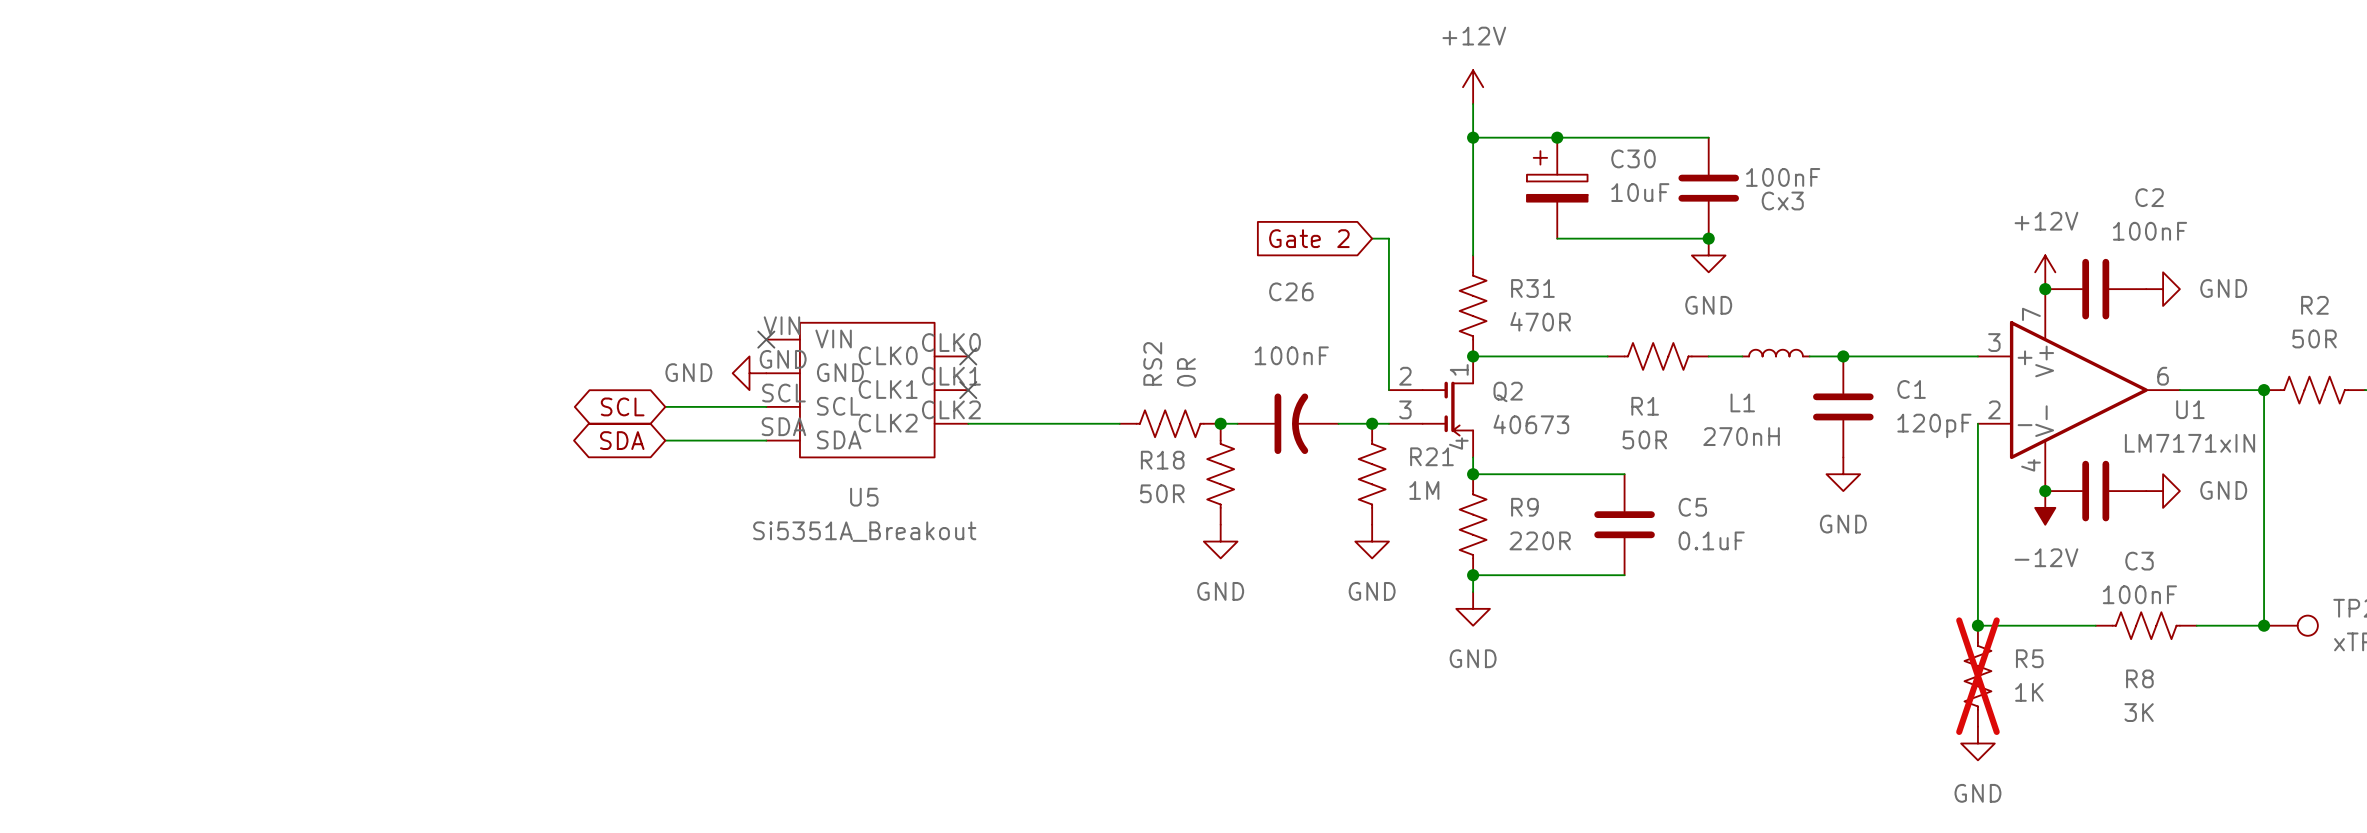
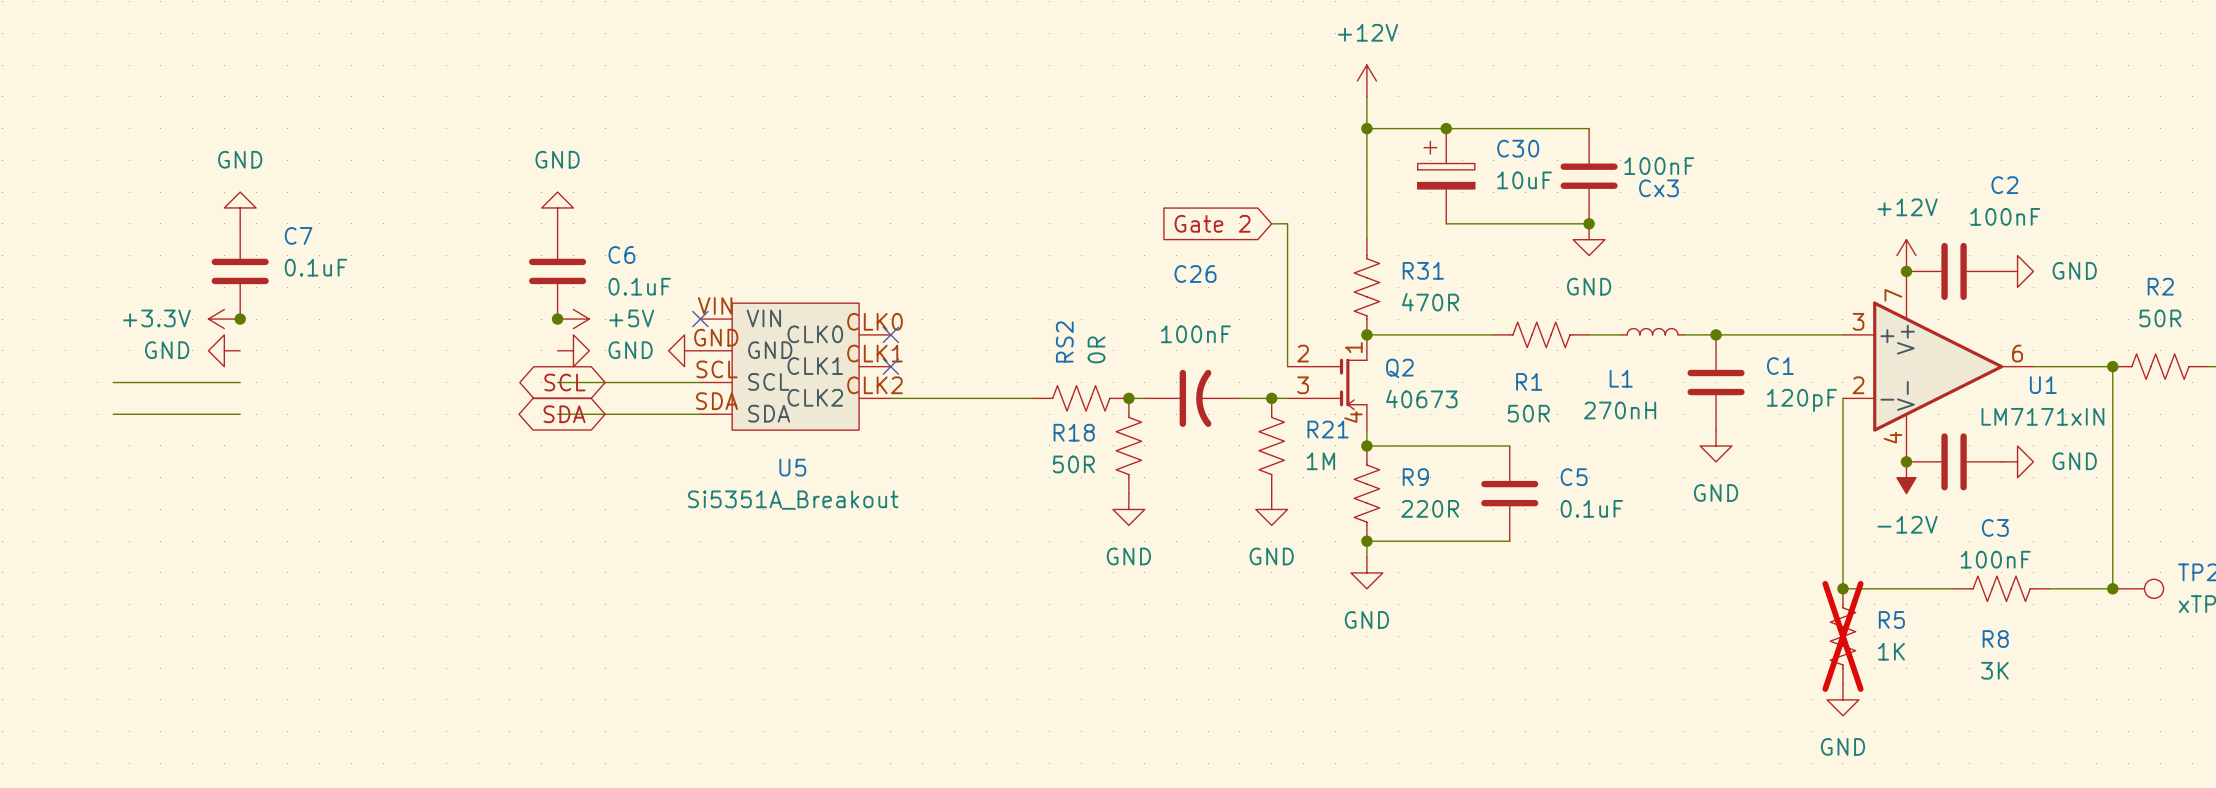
power symbol: none -> GND (240, 207)
power symbol: none -> GND (557, 207)
C7: none -> 0.1uF (240, 271)
C6: none -> 0.1uF (557, 271)
power symbol: none -> +3.3V (224, 319)
junction: none -> (240, 319)
junction: none -> (557, 319)
power symbol: none -> +5V (573, 319)
power symbol text: GND (688, 372) -> none
power symbol: none -> GND (224, 350)
power symbol: none -> GND (573, 350)
wire: none -> (113, 382) (240, 382)
wire: none -> (557, 382) (605, 382)
wire: none -> (113, 414) (240, 414)
wire: none -> (557, 414) (605, 414)

